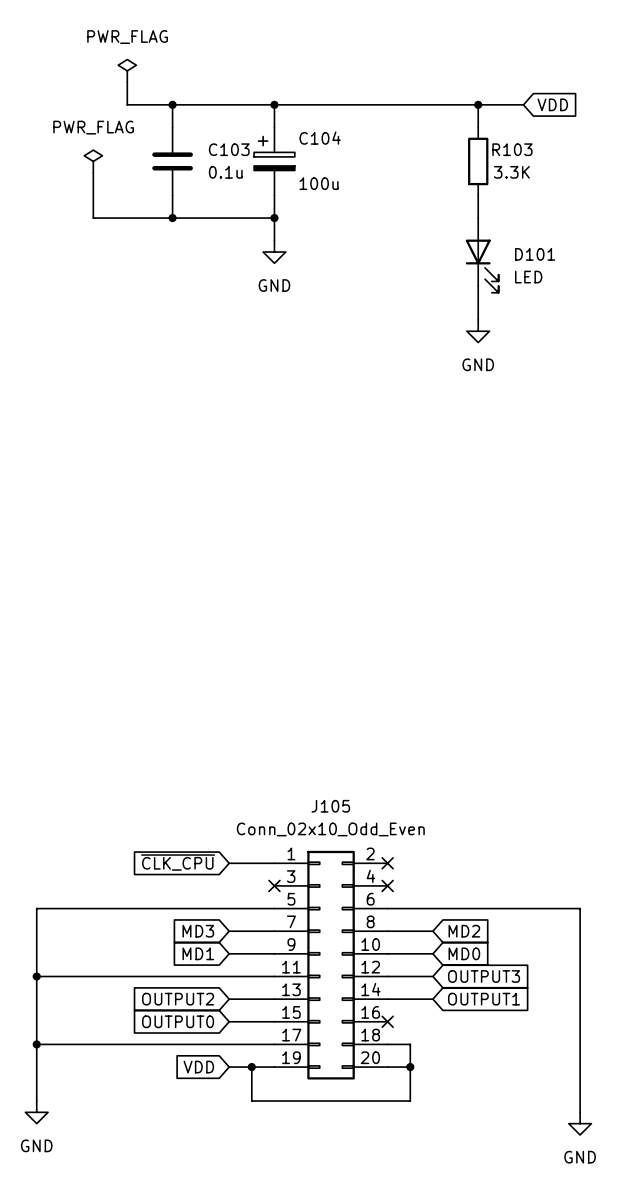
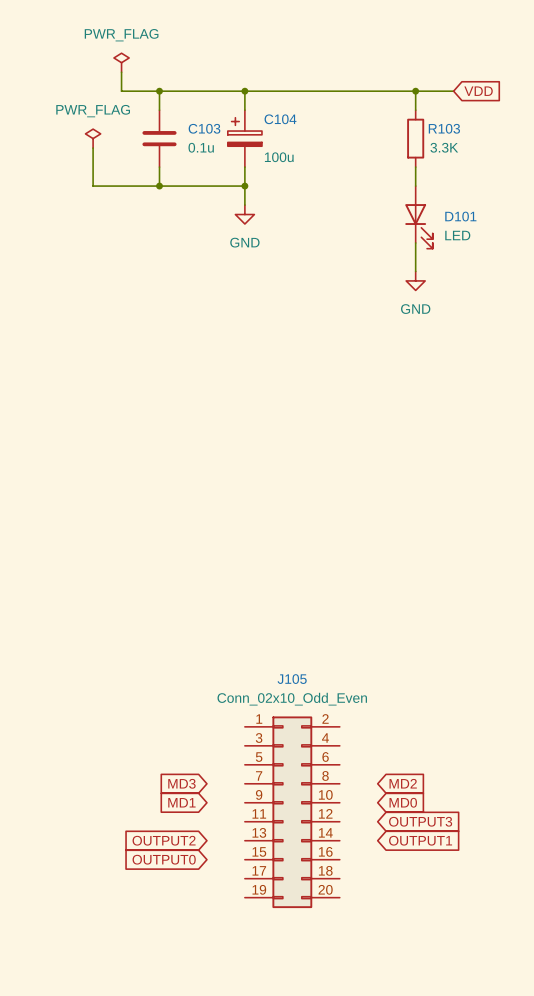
global label: ~{CLK_CPU} (178, 862) -> none
wire: (229, 863) (274, 863) -> none
no-connect mark: (387, 863) -> none
no-connect mark: (274, 885) -> none
no-connect mark: (387, 885) -> none
wire: (274, 908) (36, 908) (36, 1101) -> none
wire: (387, 908) (580, 908) (580, 1112) -> none
wire: (229, 931) (274, 931) -> none
wire: (387, 931) (432, 931) -> none
wire: (229, 953) (274, 953) -> none
wire: (387, 953) (432, 953) -> none
wire: (36, 976) (274, 976) -> none
junction: (36, 976) -> none
wire: (387, 976) (432, 976) -> none
wire: (229, 999) (274, 999) -> none
wire: (387, 999) (432, 999) -> none
wire: (229, 1021) (274, 1021) -> none
no-connect mark: (387, 1021) -> none
wire: (36, 1044) (274, 1044) -> none
junction: (36, 1044) -> none
wire: (387, 1044) (410, 1044) (410, 1101) (251, 1101) (251, 1067) -> none
global label: VDD (198, 1067) -> none
wire: (229, 1067) (274, 1067) -> none
junction: (251, 1067) -> none
wire: (387, 1067) (410, 1067) -> none
junction: (410, 1067) -> none
power symbol: GND (36, 1112) -> none
power symbol: GND (580, 1123) -> none

